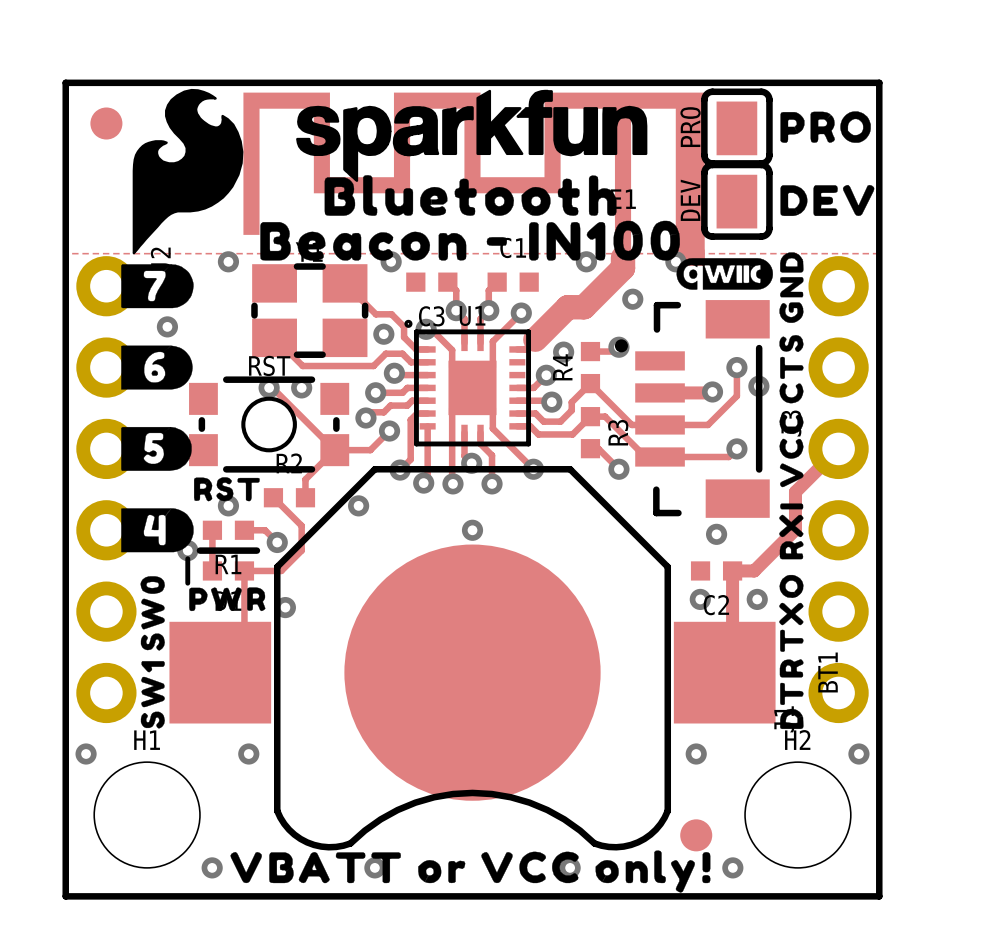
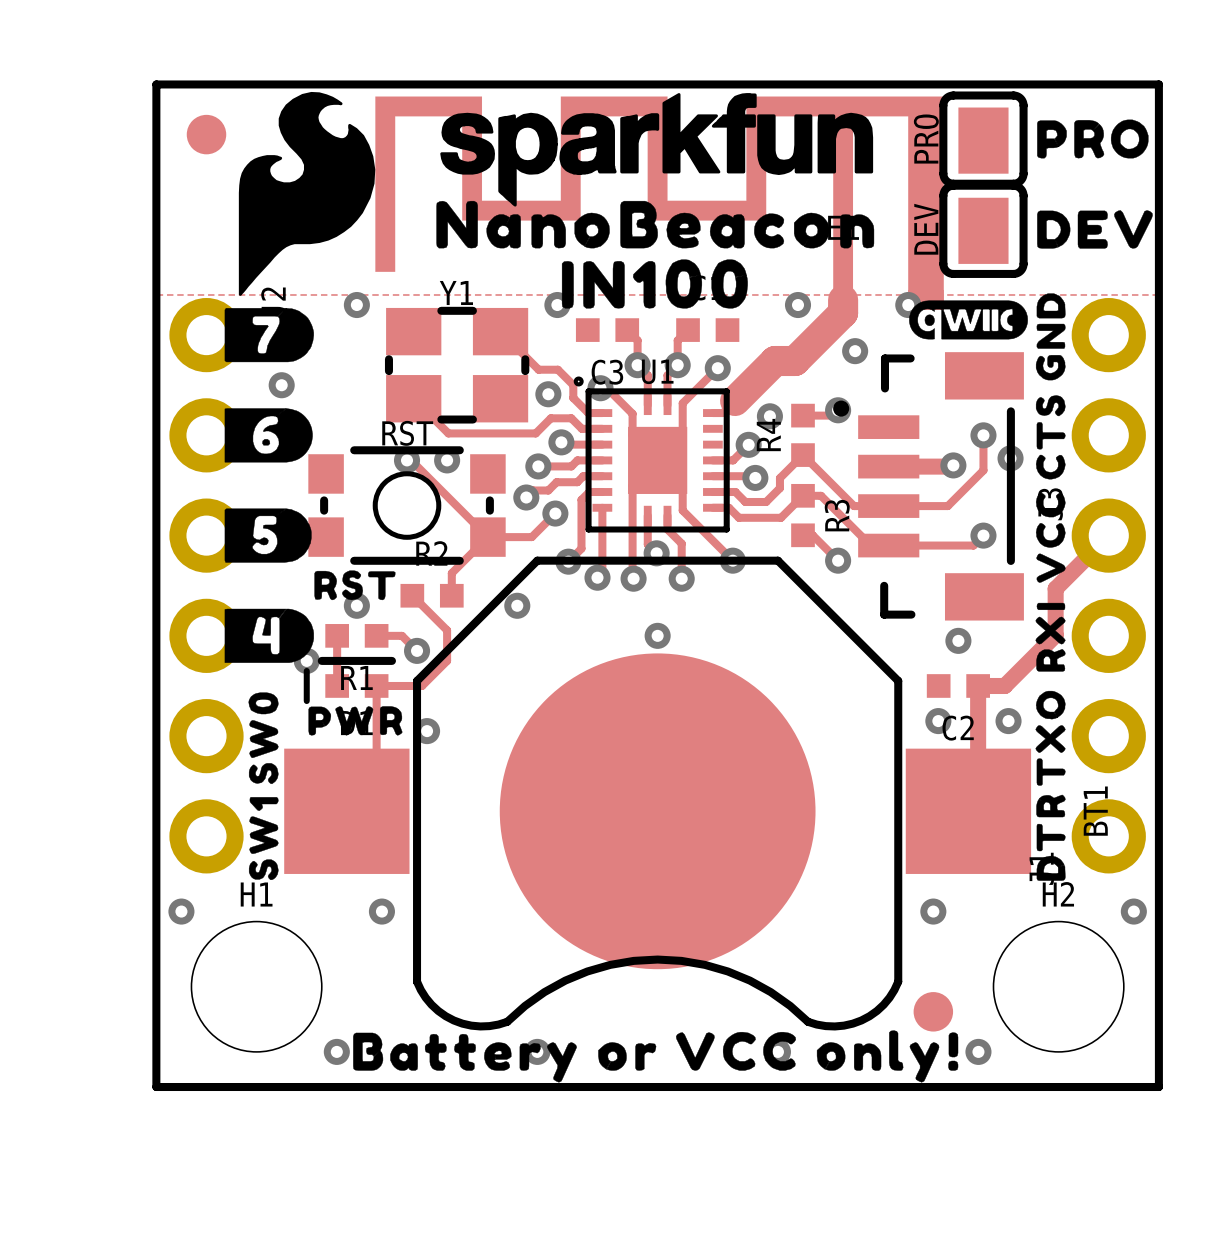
drawing shape: [324, 175, 617, 216] -> [436, 200, 875, 249]
drawing shape: [260, 220, 680, 261] -> [561, 259, 748, 309]
drawing shape: [230, 850, 711, 893] -> [353, 1030, 959, 1083]

